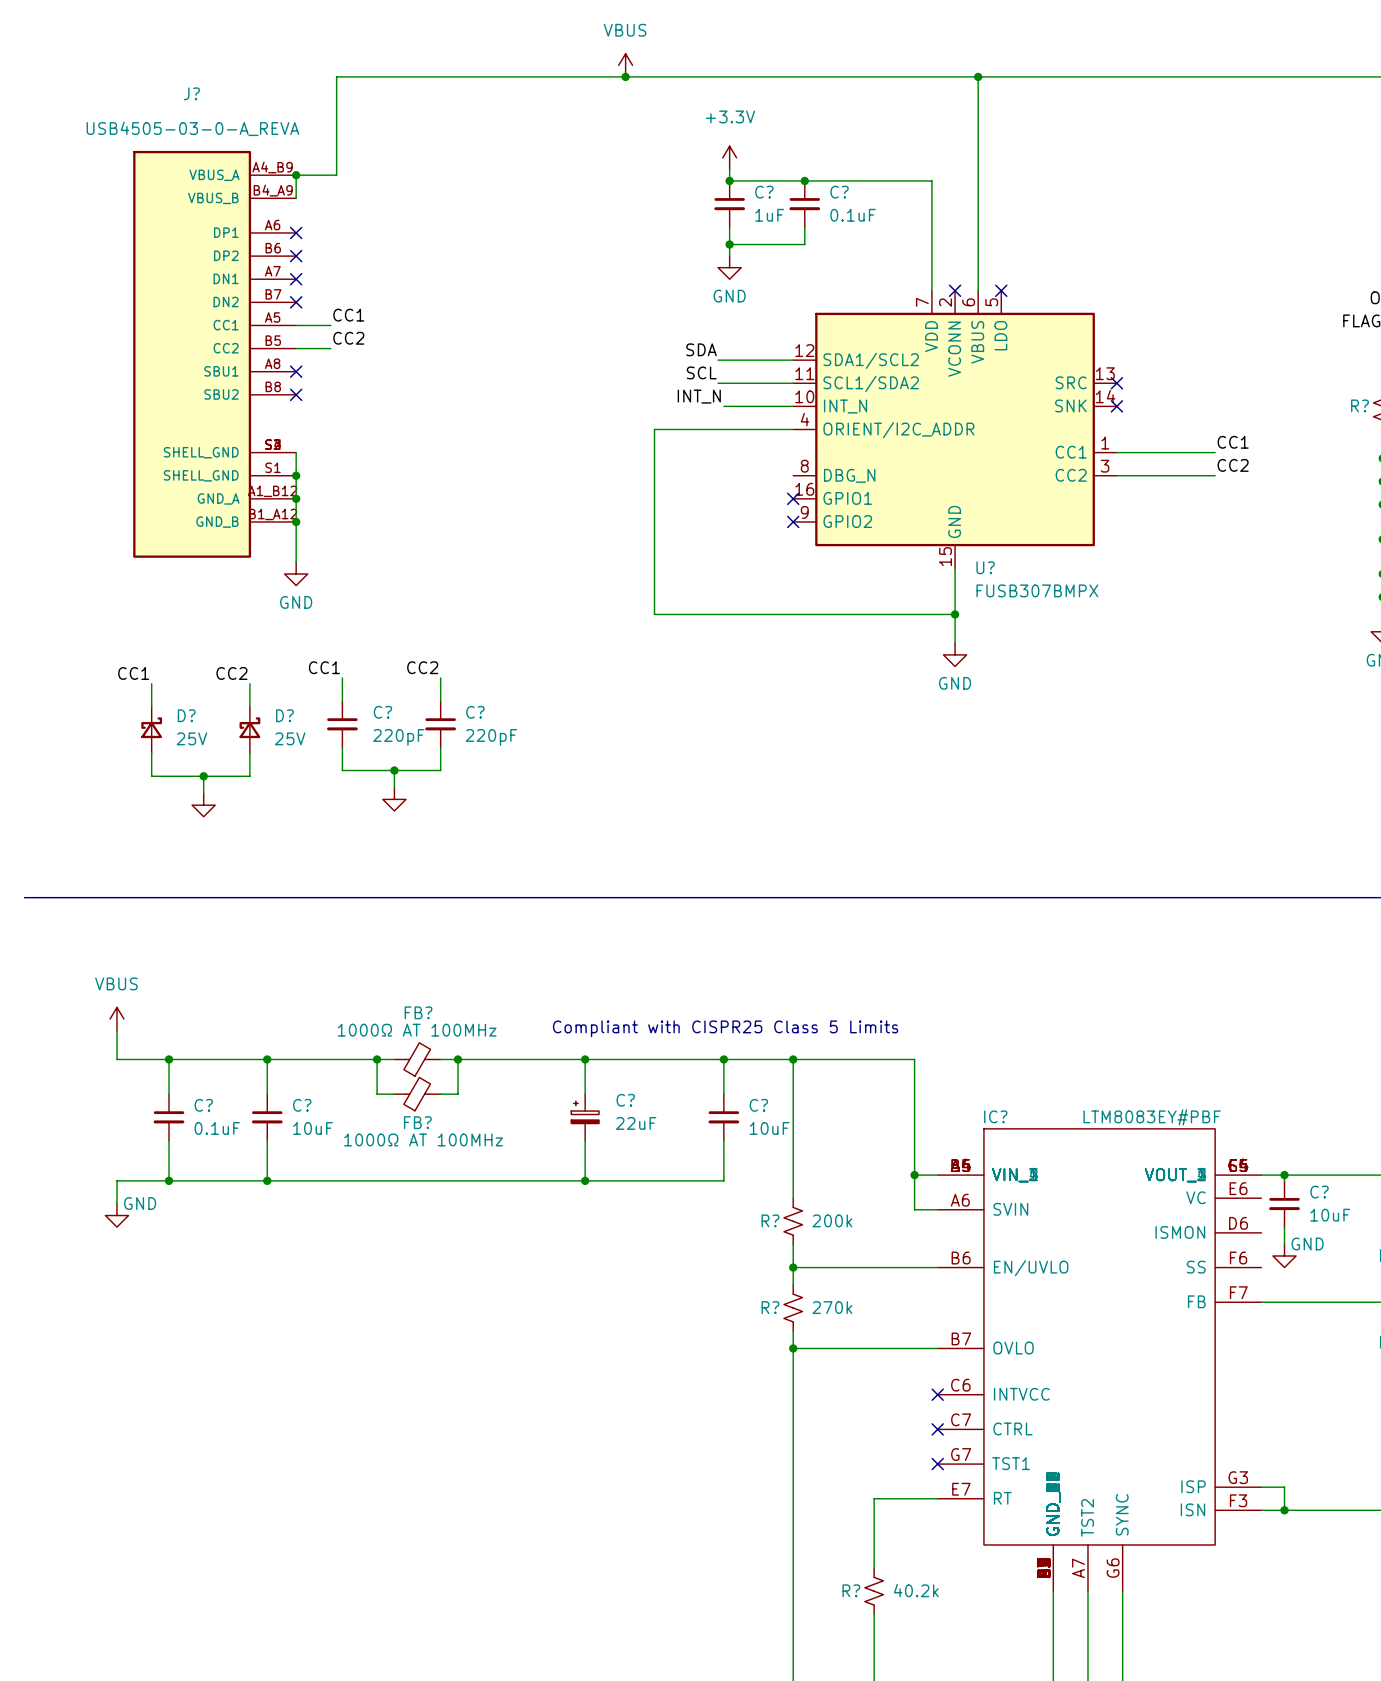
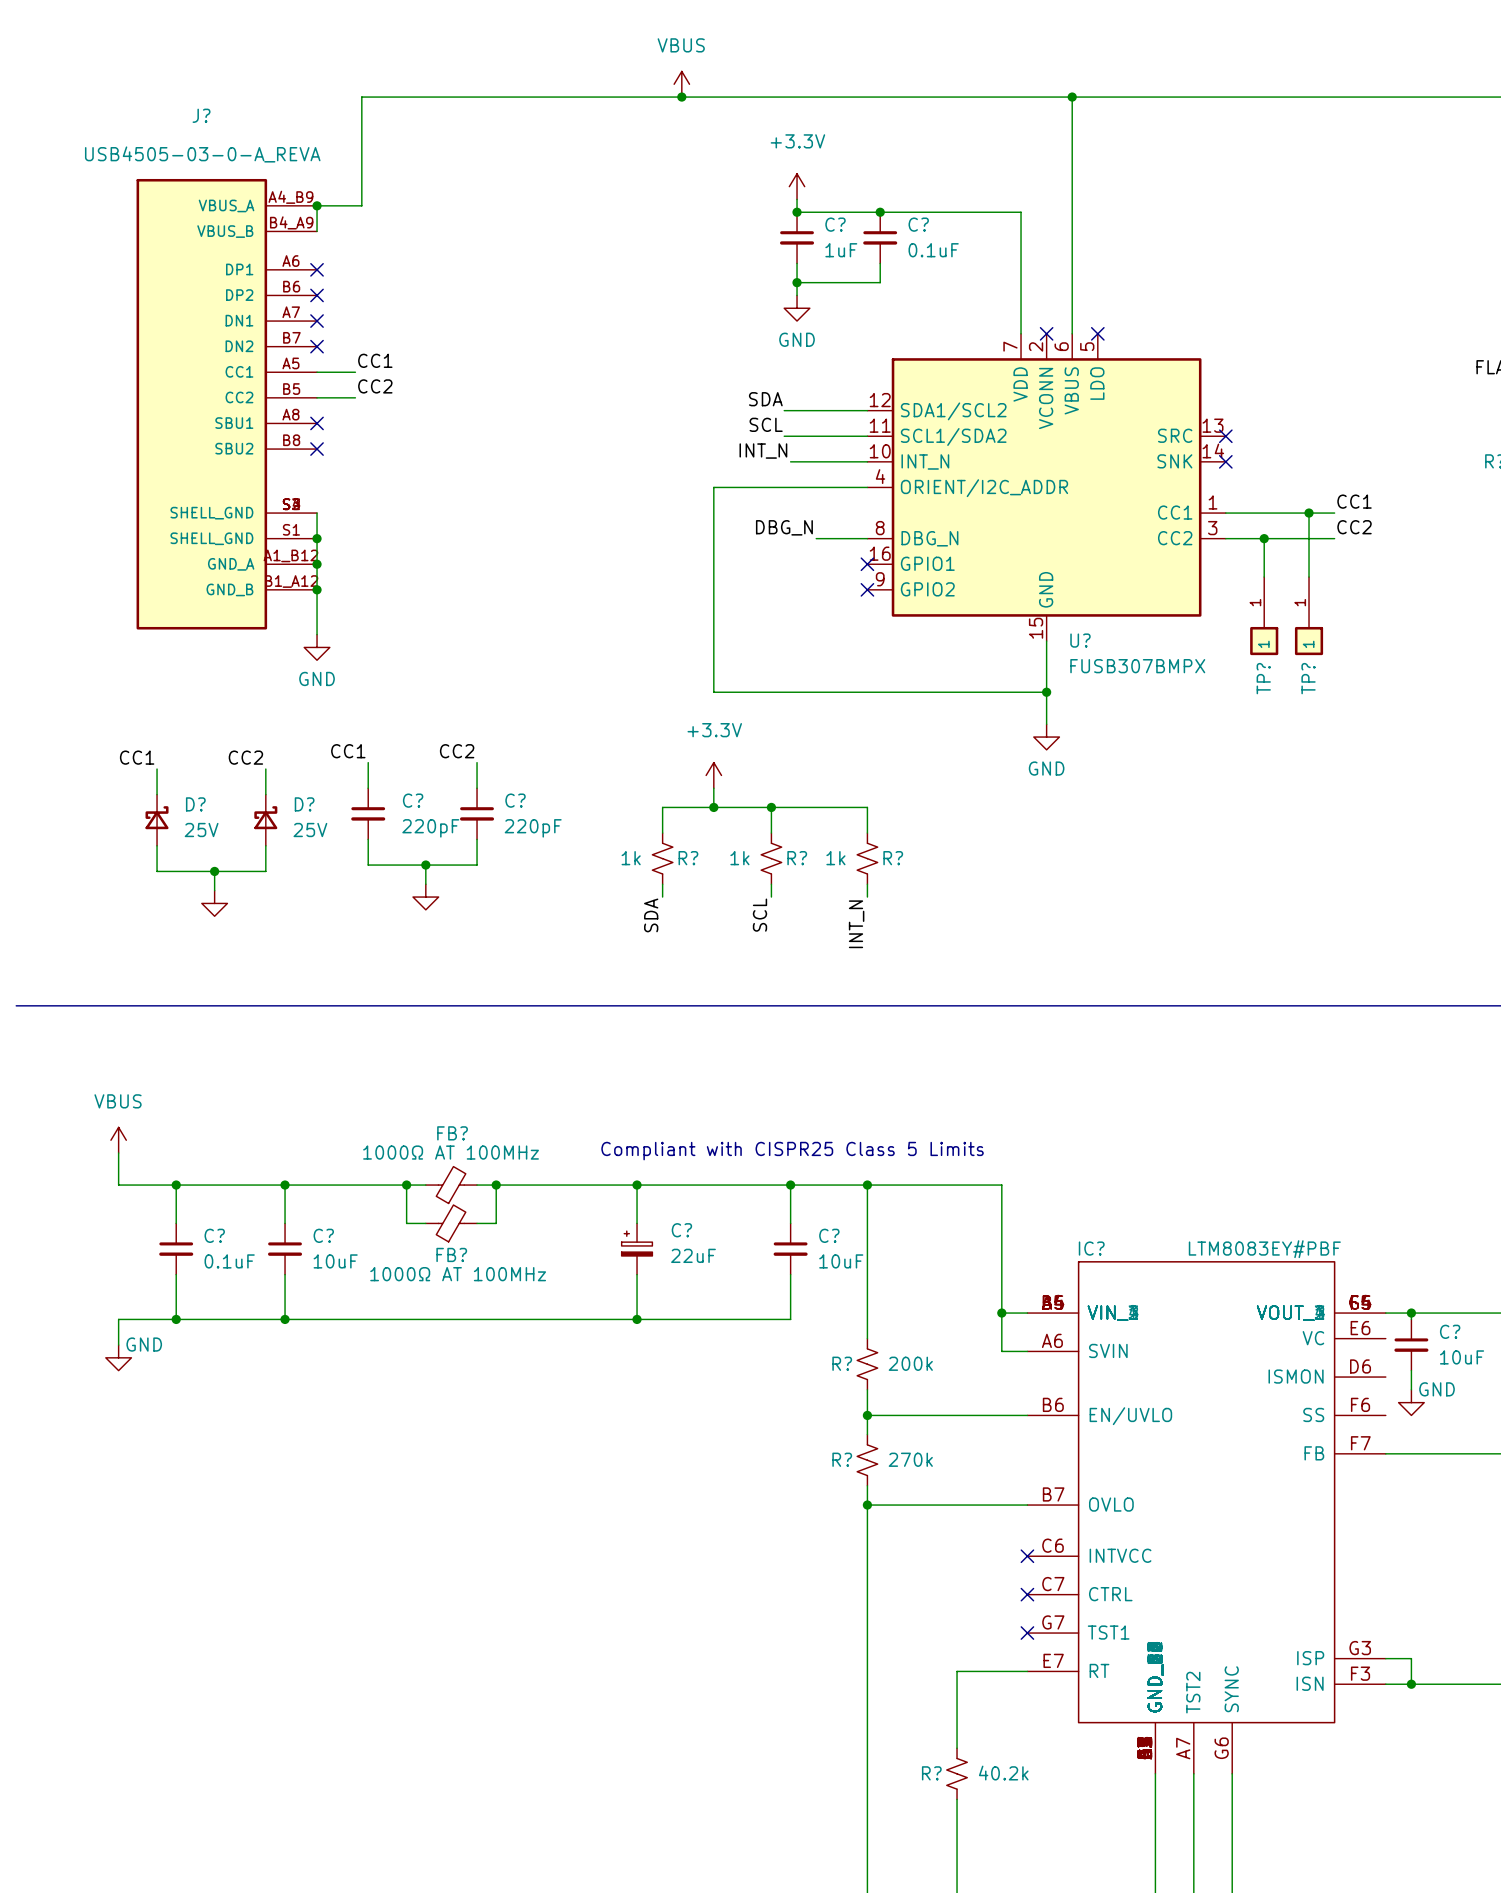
wire: none -> (1309, 513) (1309, 577)
junction: none -> (1309, 513)
label: none -> DBG_N (784, 527)
wire: none -> (816, 538) (867, 538)
wire: none -> (1264, 538) (1264, 577)
junction: none -> (1264, 538)
TP?: none -> (1264, 616)
TP?: none -> (1309, 616)
power symbol: none -> +3.3V (713, 775)
wire: none -> (713, 788) (713, 807)
junction: none -> (713, 807)
wire: none -> (771, 807) (771, 833)
junction: none -> (771, 807)
wire: none -> (662, 833) (662, 807) (867, 807) (867, 833)
R?: none -> 1k (662, 858)
R?: none -> 1k (771, 858)
R?: none -> 1k (867, 858)
wire: none -> (662, 884) (662, 897)
wire: none -> (771, 884) (771, 897)
wire: none -> (867, 884) (867, 897)
label: none -> SCL (759, 915)
label: none -> SDA (651, 915)
label: none -> INT_N (856, 924)

